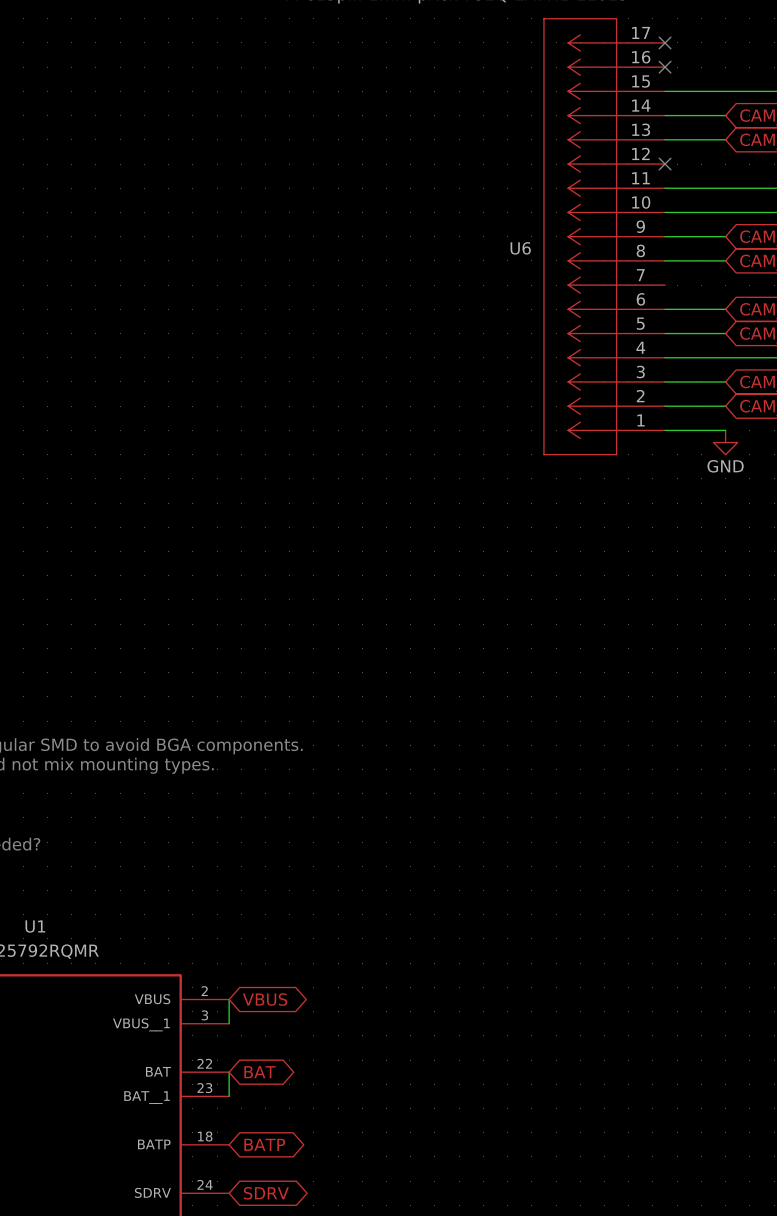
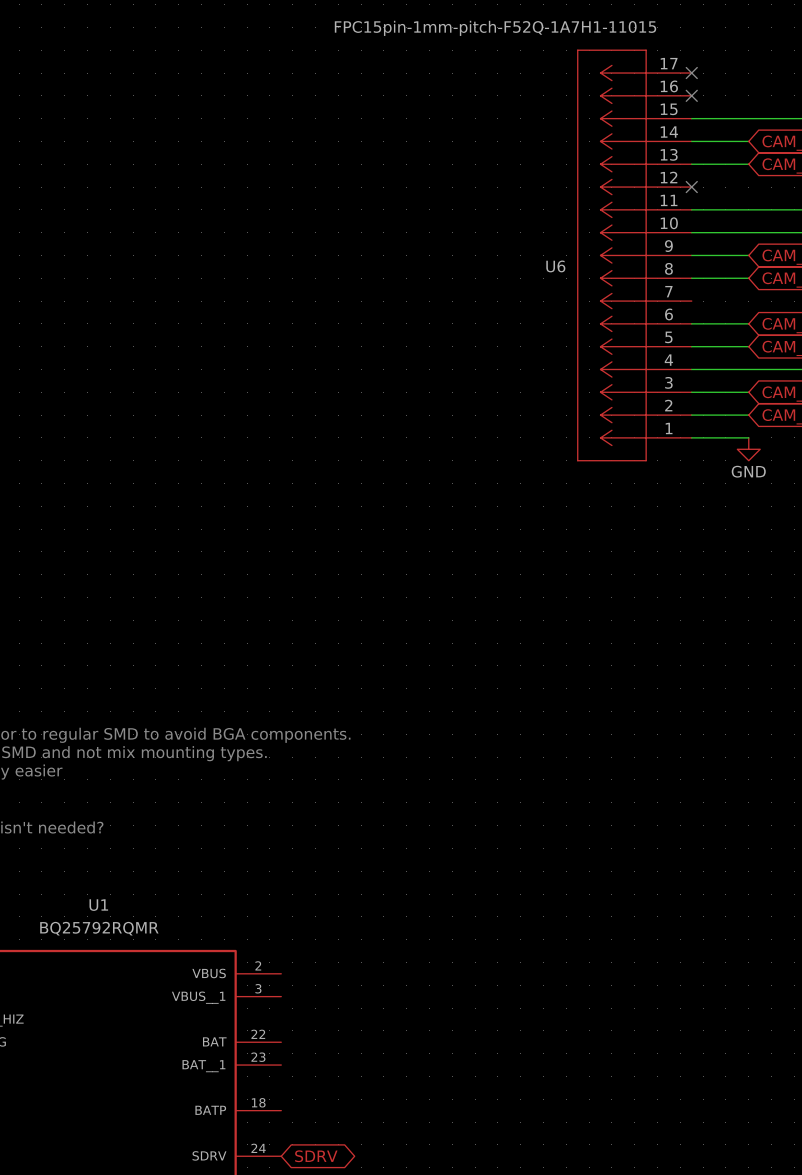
wire: (229, 999) (229, 1023) -> none
global label: VBUS (265, 999) -> none
wire: (229, 1072) (229, 1096) -> none
global label: BAT (260, 1072) -> none
global label: BATP (264, 1144) -> none

